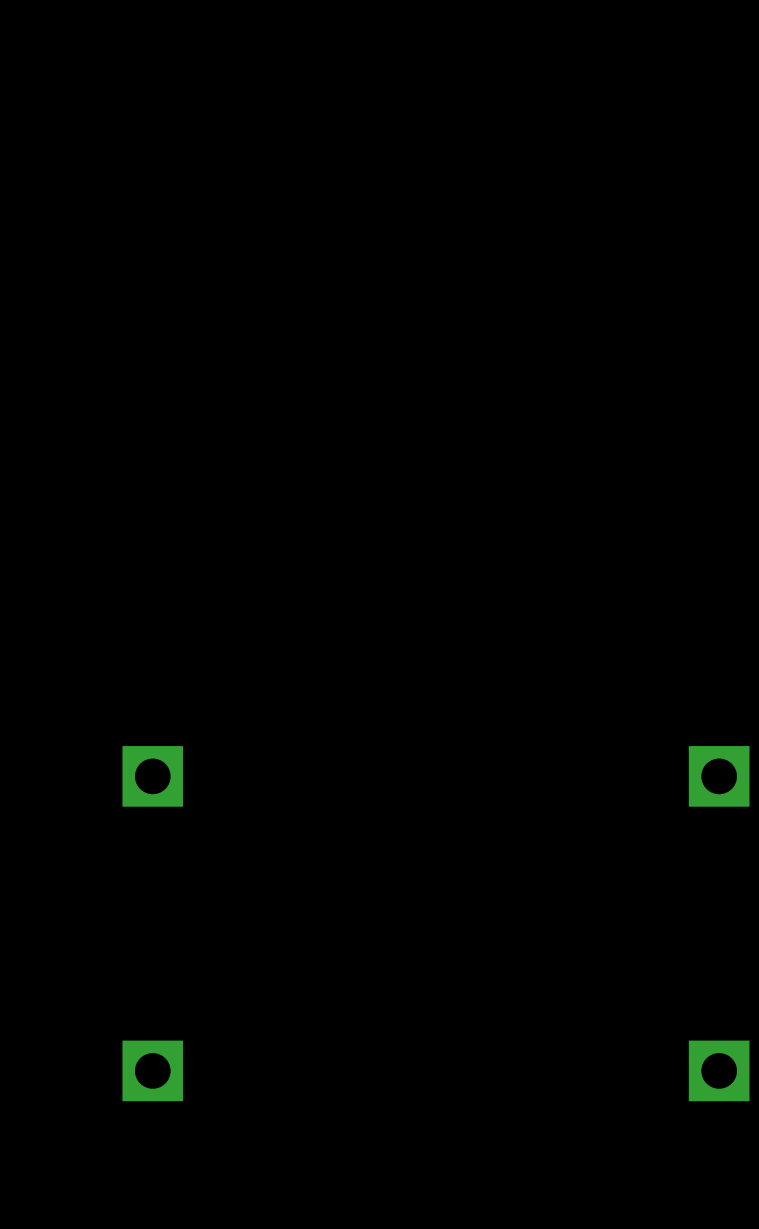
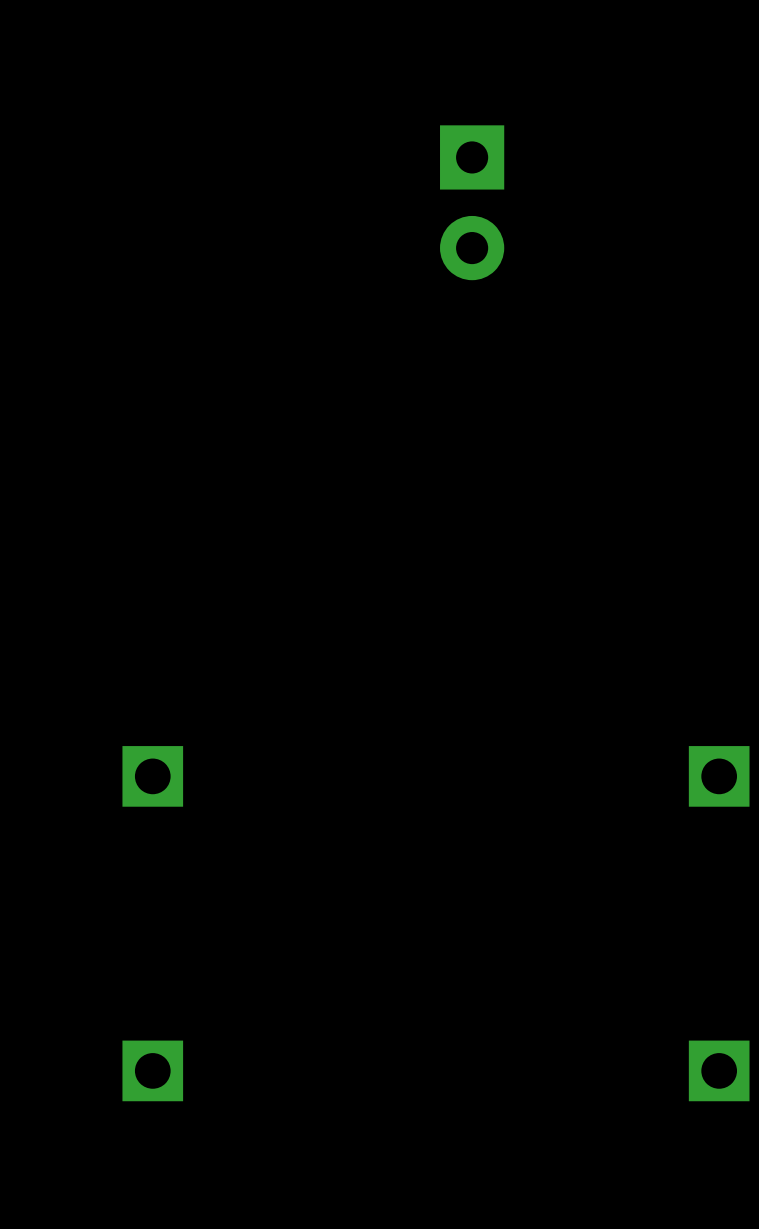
part: none -> (472, 202)

